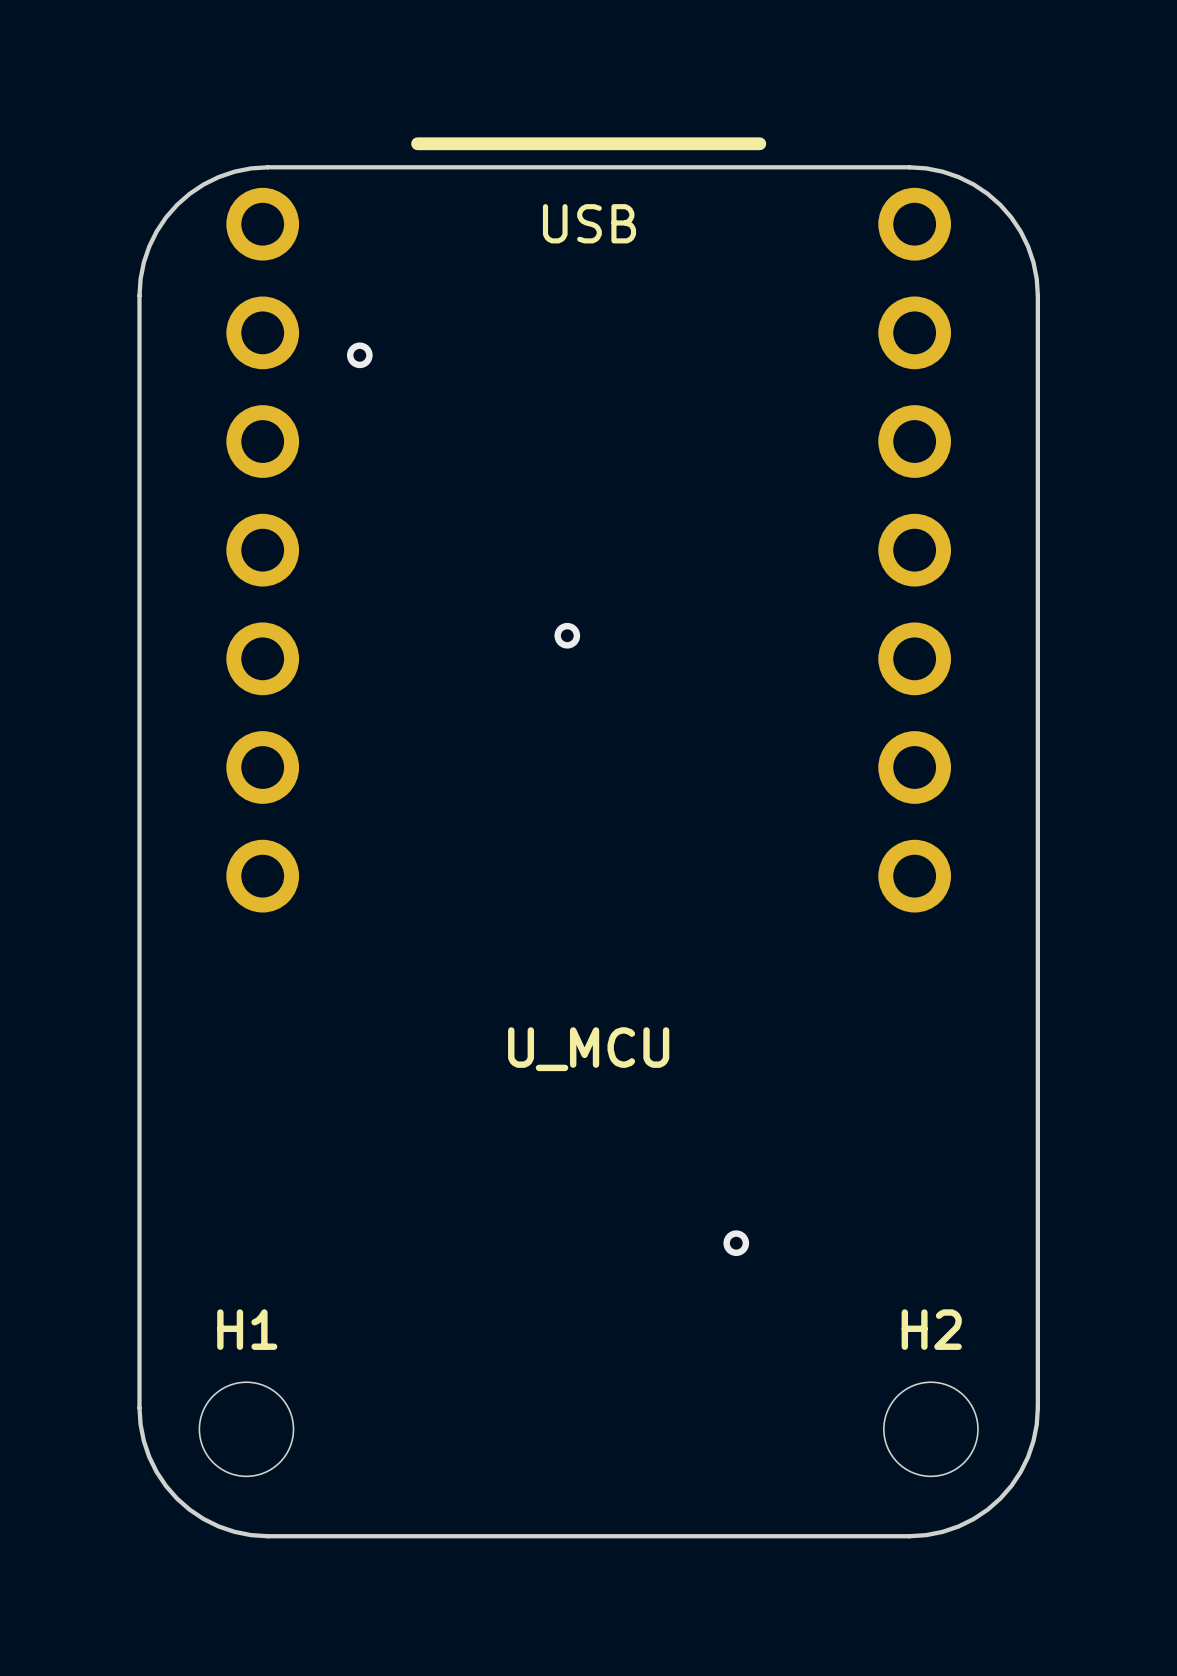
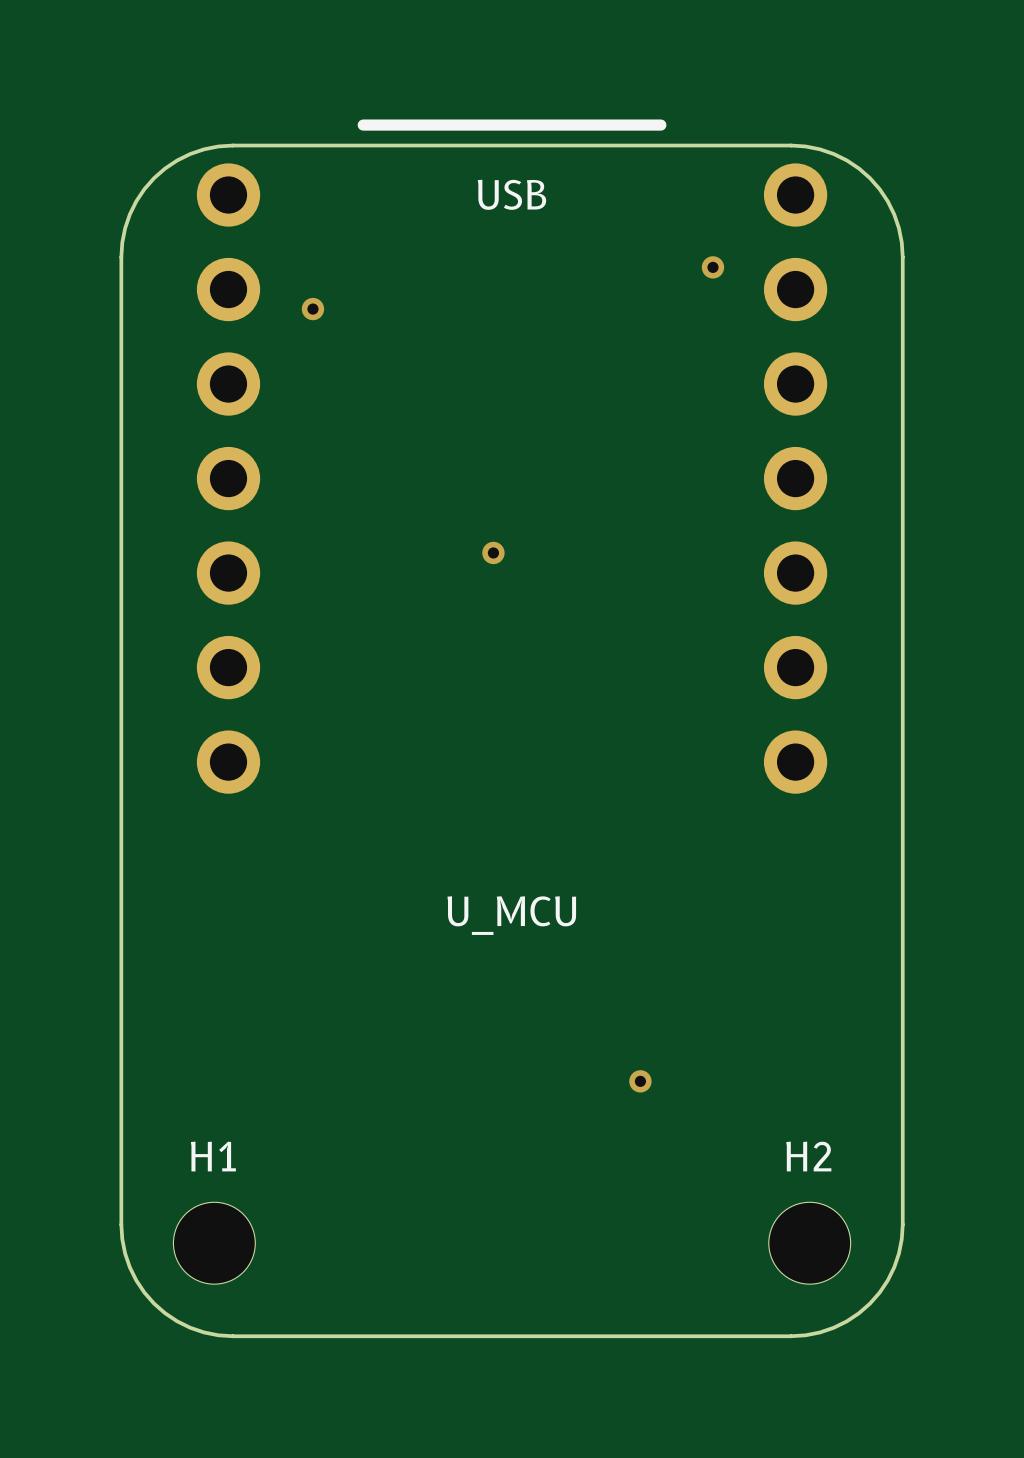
via: none -> (712, 267)

